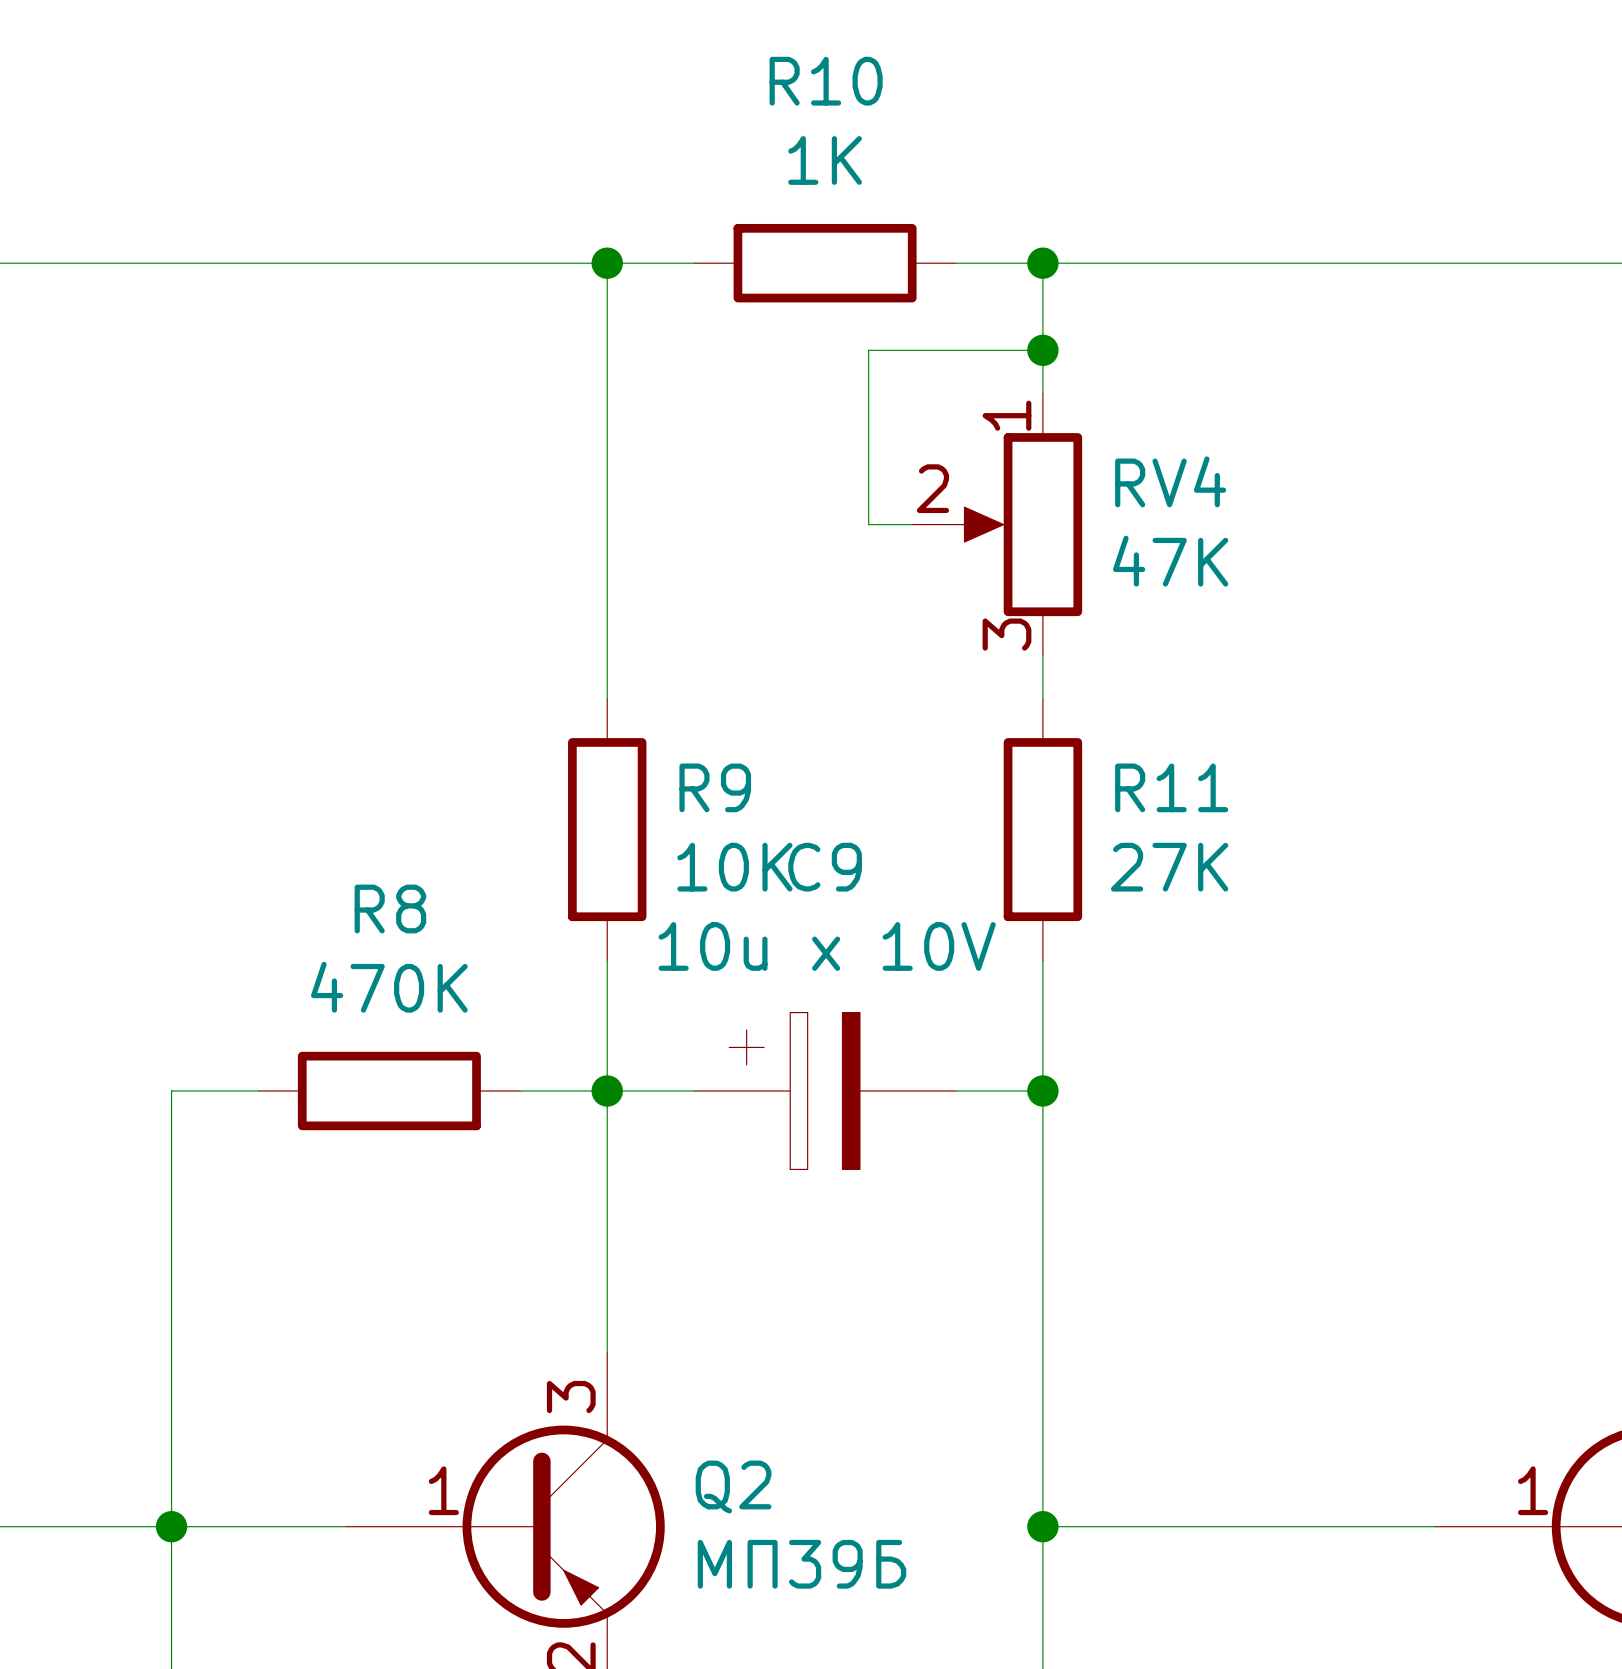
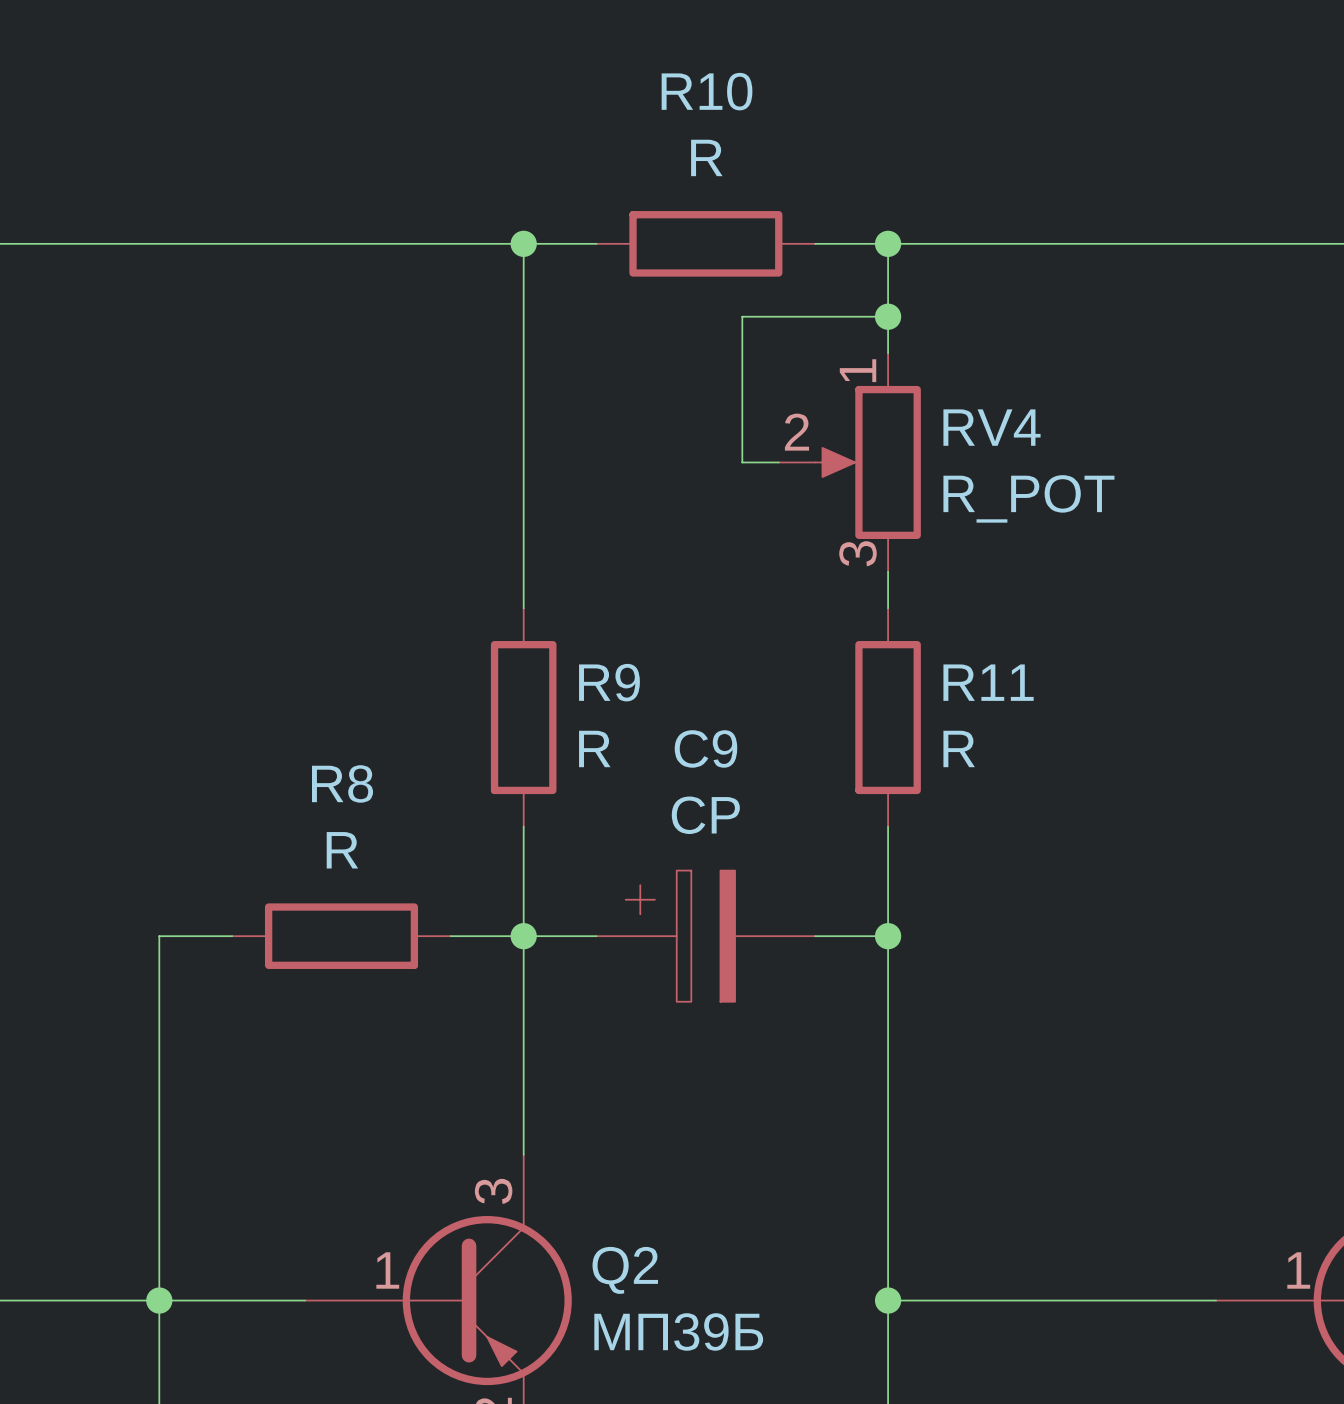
R10 value: 1K (825, 160) -> R (706, 157)
RV4 value: 47K (1170, 561) -> R_POT (1028, 498)
R9 value: 10K (734, 867) -> R (594, 748)
R11 value: 27K (1169, 867) -> R (959, 748)
C9 value: 10u x 10V (827, 946) -> CP (705, 815)
R8 value: 470K (389, 987) -> R (342, 850)

